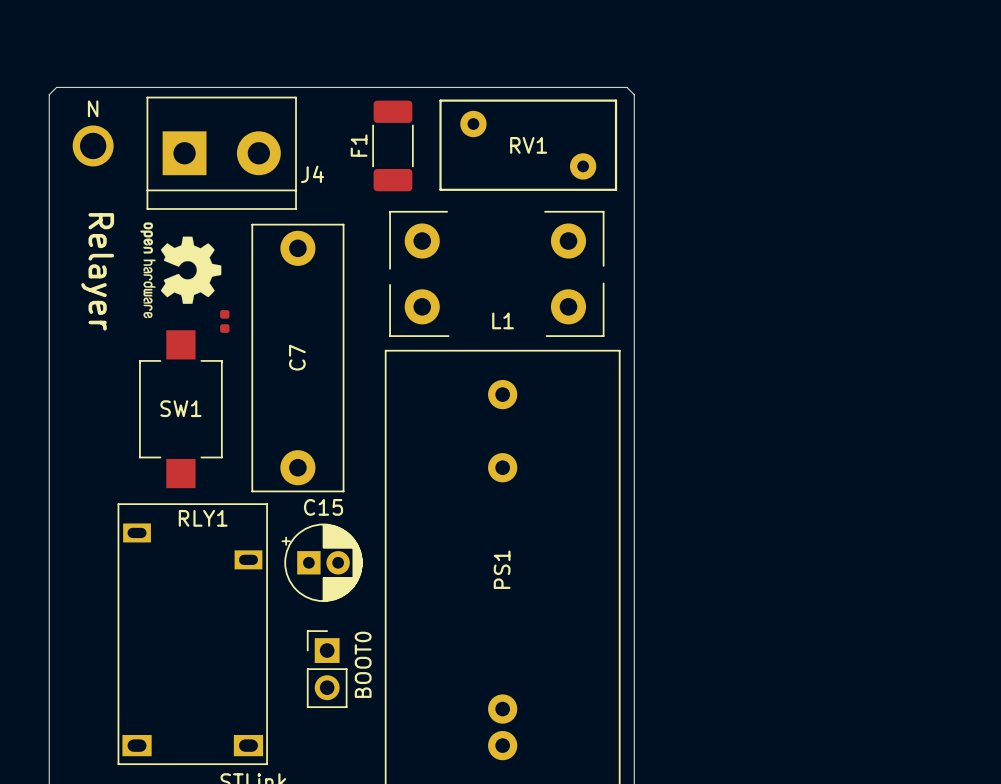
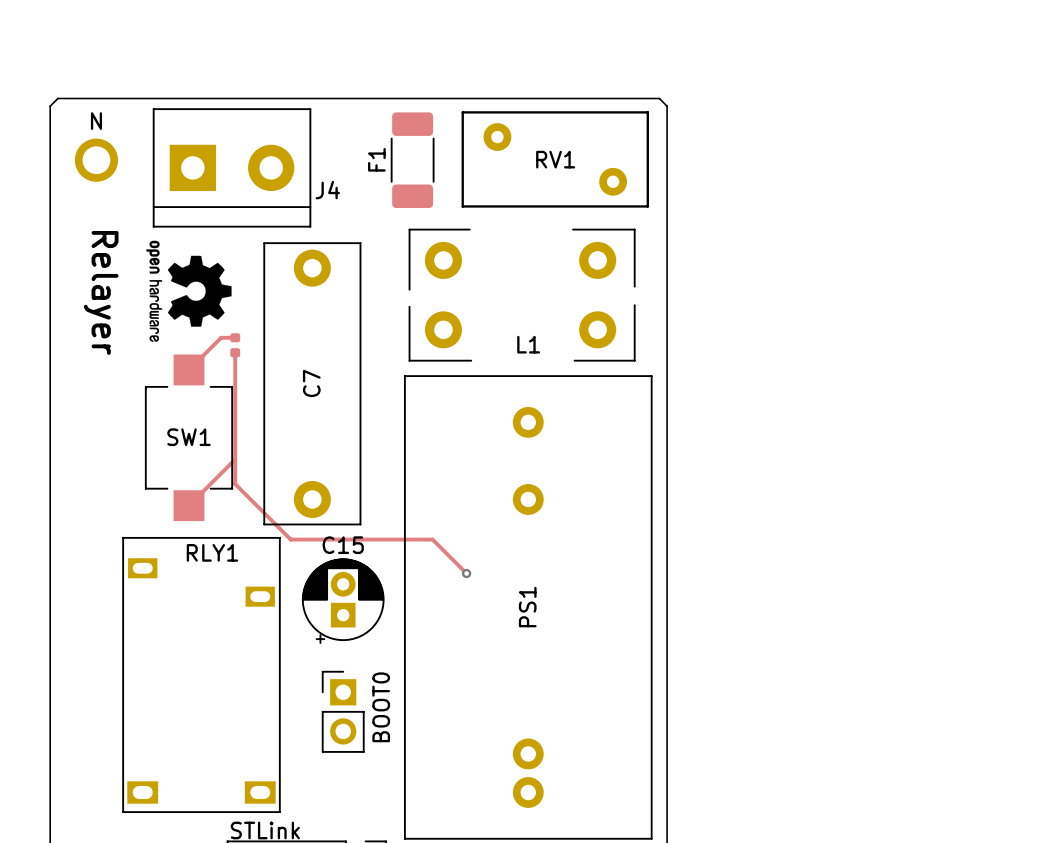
track: none -> (235, 337) (221, 337) (188, 369)
track: none -> (235, 352) (235, 484) (290, 539) (432, 539) (466, 573)
track: none -> (235, 459) (188, 505)
via: none -> (466, 573)
C15 rotation: 0° (322, 562) -> 90° counterclockwise (343, 601)

